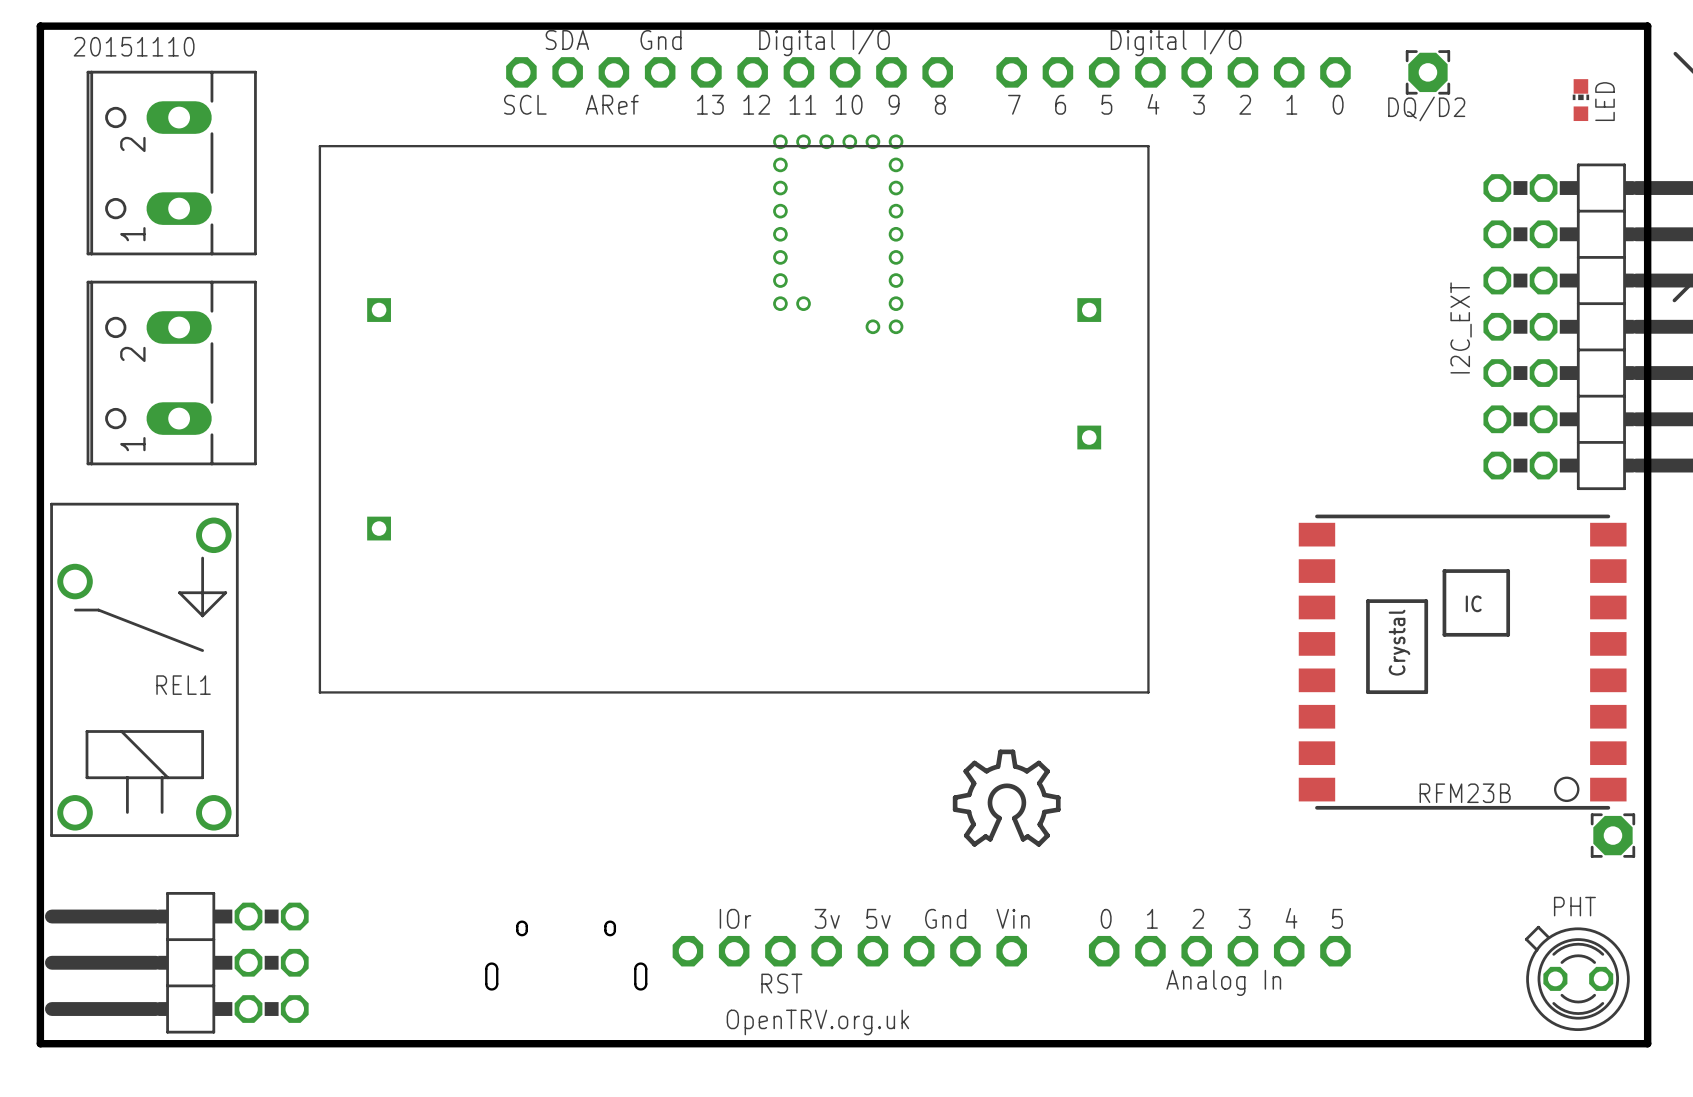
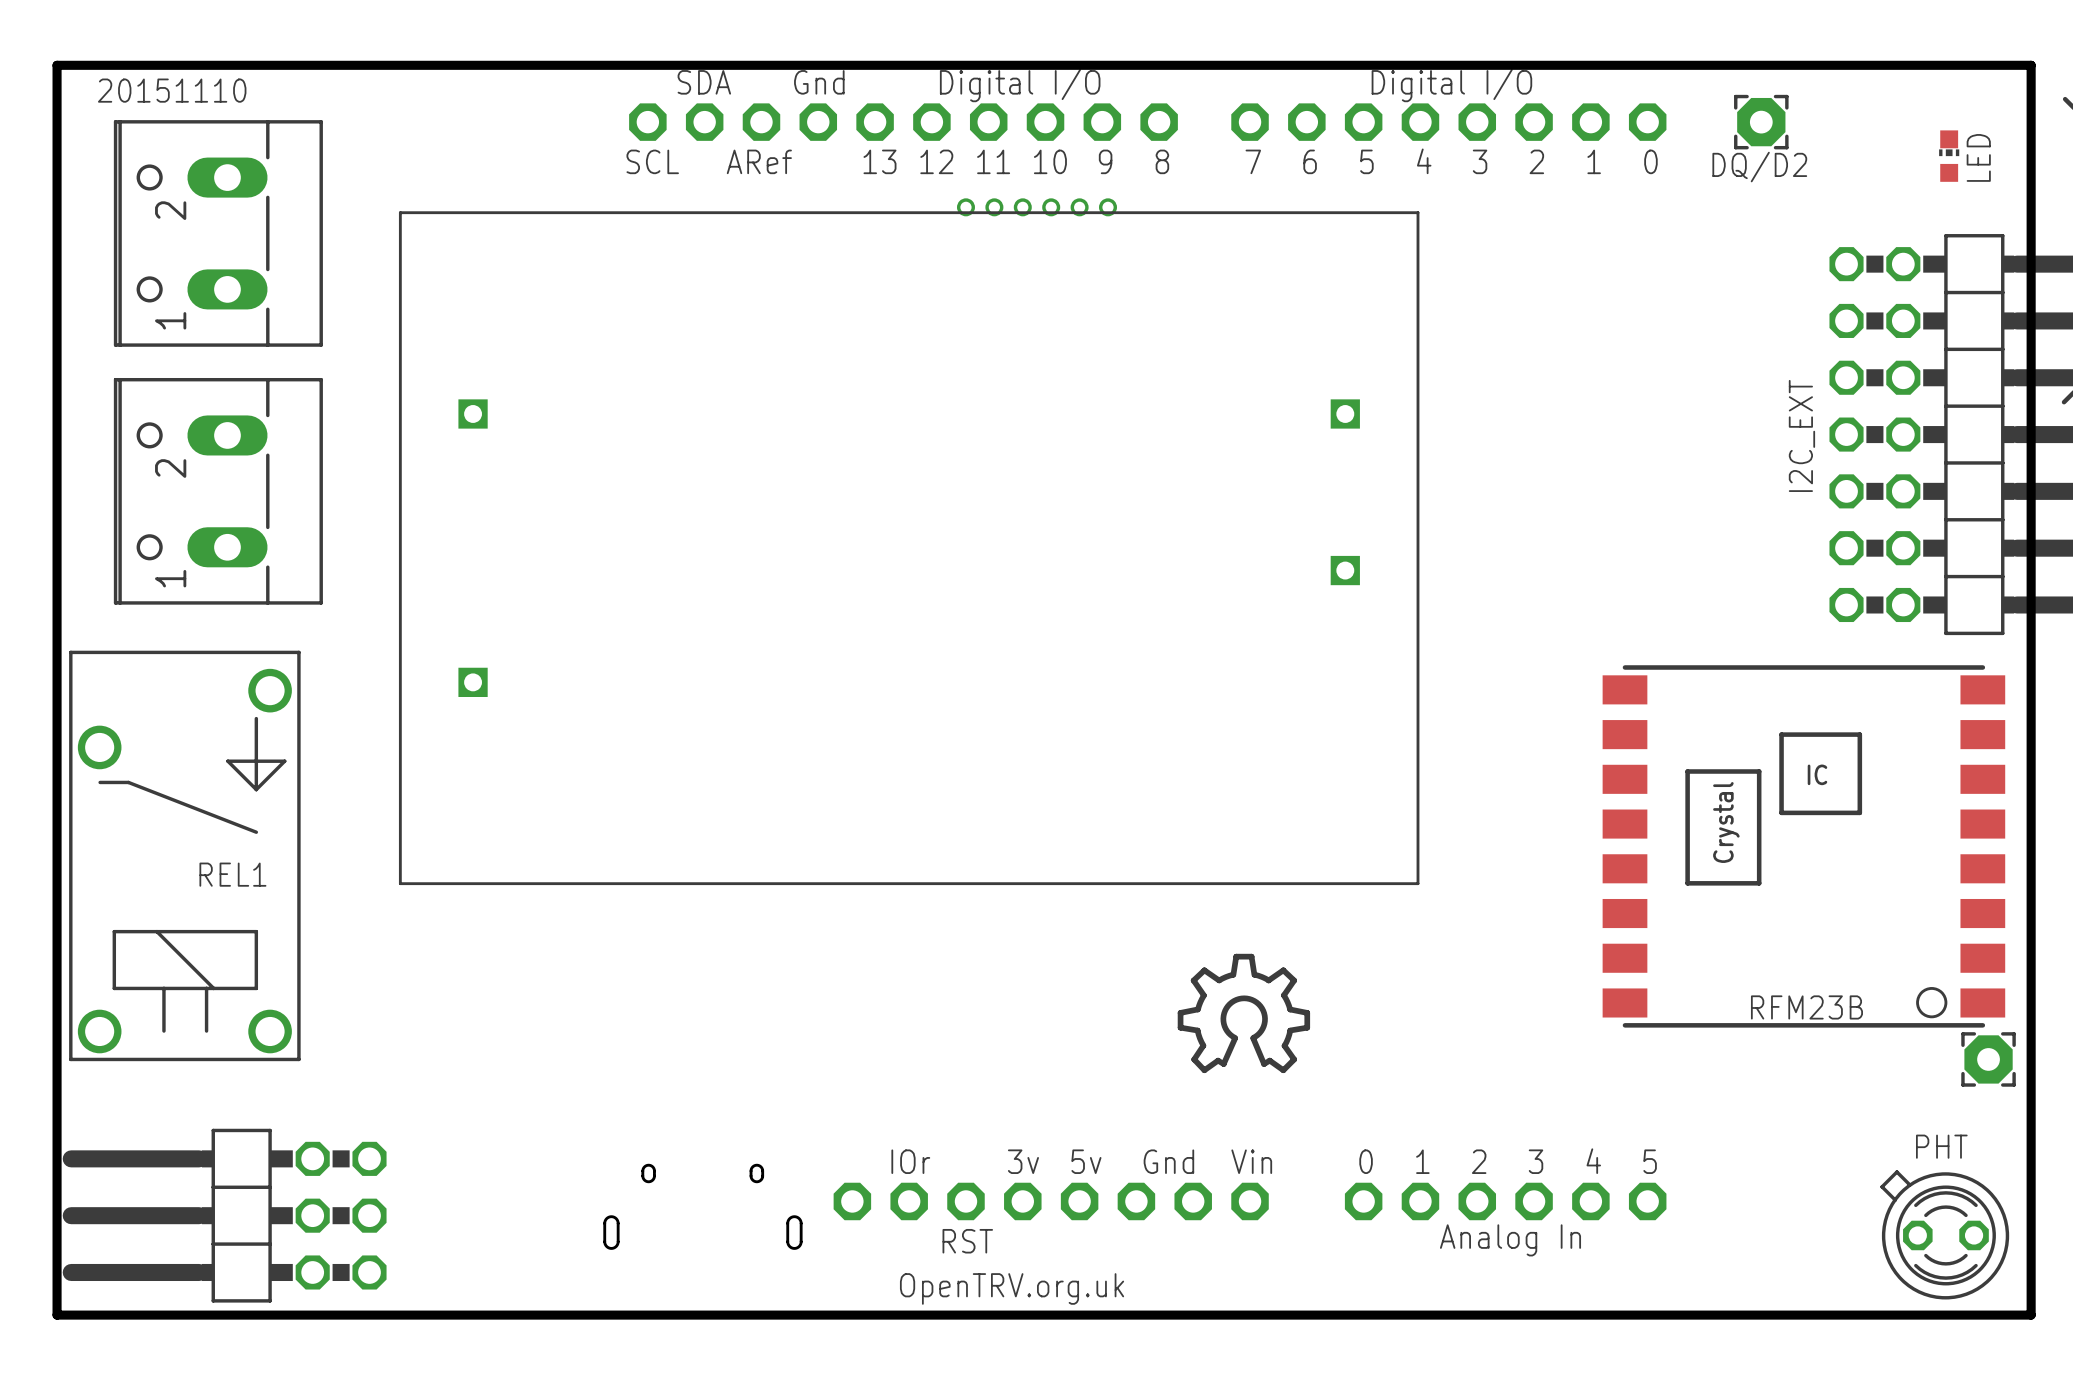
via: (780, 164) -> none
via: (896, 164) -> none
via: (780, 188) -> none
via: (896, 188) -> none
via: (780, 211) -> none
via: (896, 211) -> none
via: (780, 234) -> none
via: (896, 234) -> none
via: (780, 257) -> none
via: (896, 257) -> none
via: (780, 280) -> none
via: (896, 280) -> none
via: (780, 303) -> none
via: (803, 303) -> none
via: (896, 303) -> none
via: (872, 326) -> none
via: (896, 326) -> none

